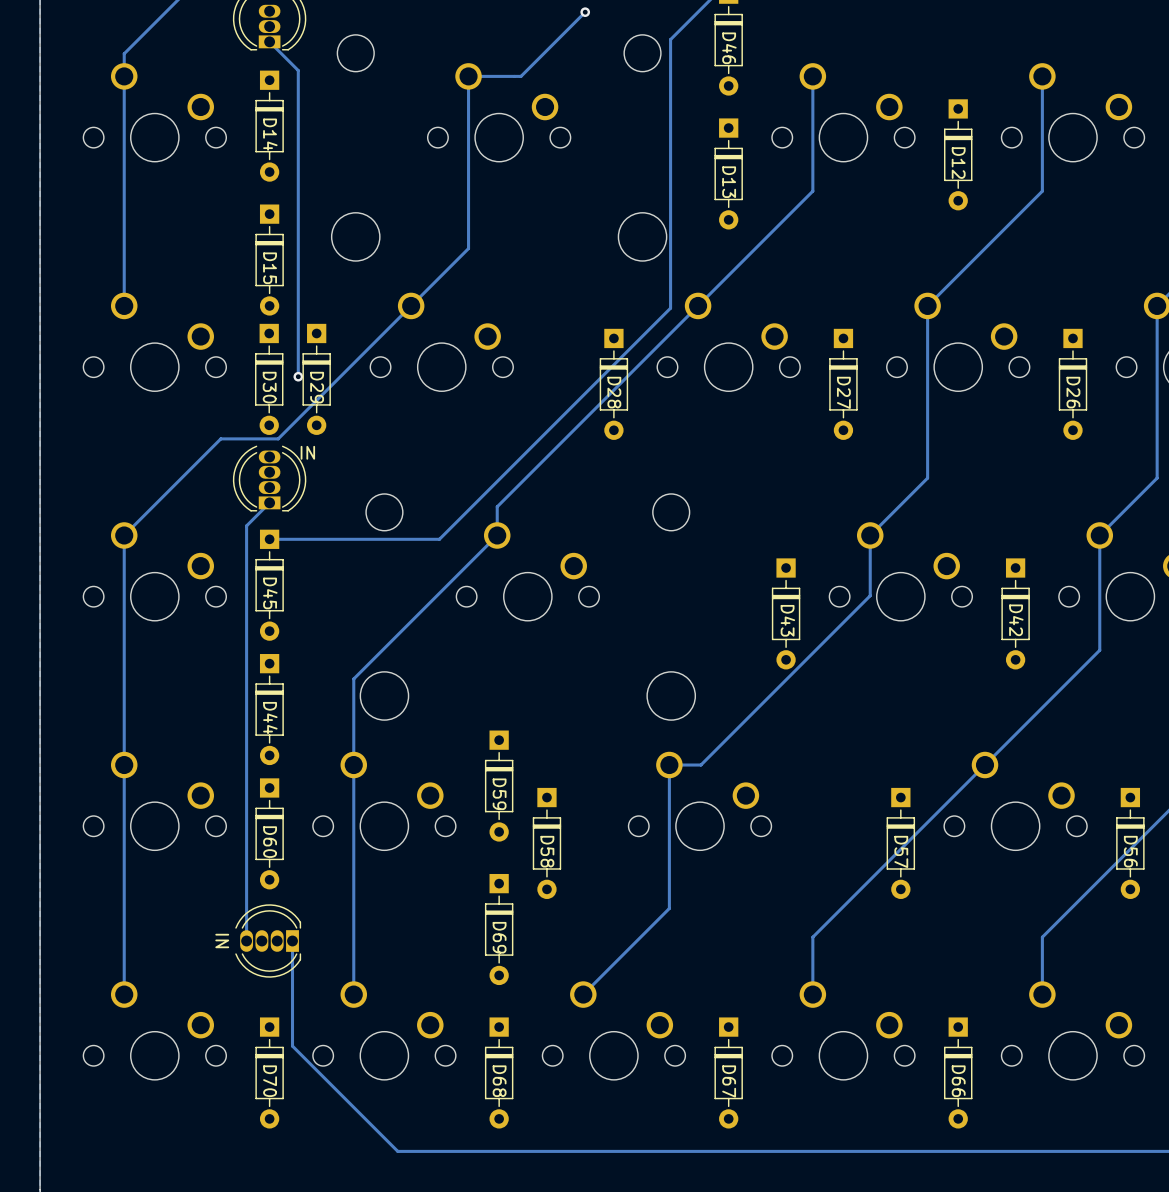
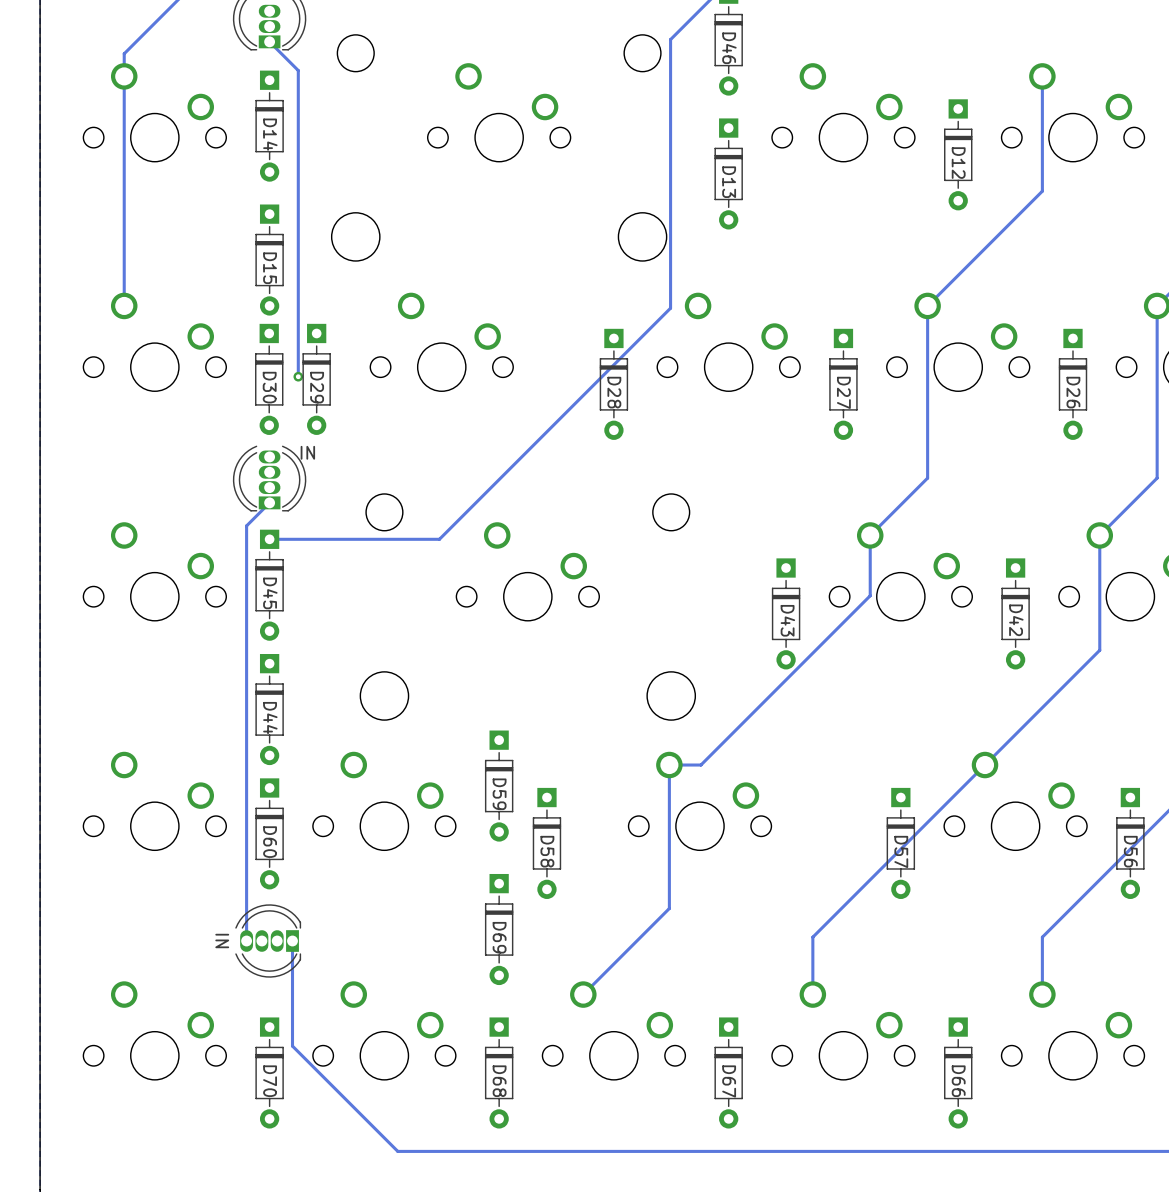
track: (585, 12) (520, 76) (468, 76) (468, 248) (278, 438) (220, 438) (124, 535) (124, 994) -> none
via: (585, 12) -> none
track: (812, 76) (812, 191) (497, 506) (497, 535) (353, 678) (353, 994) -> none

